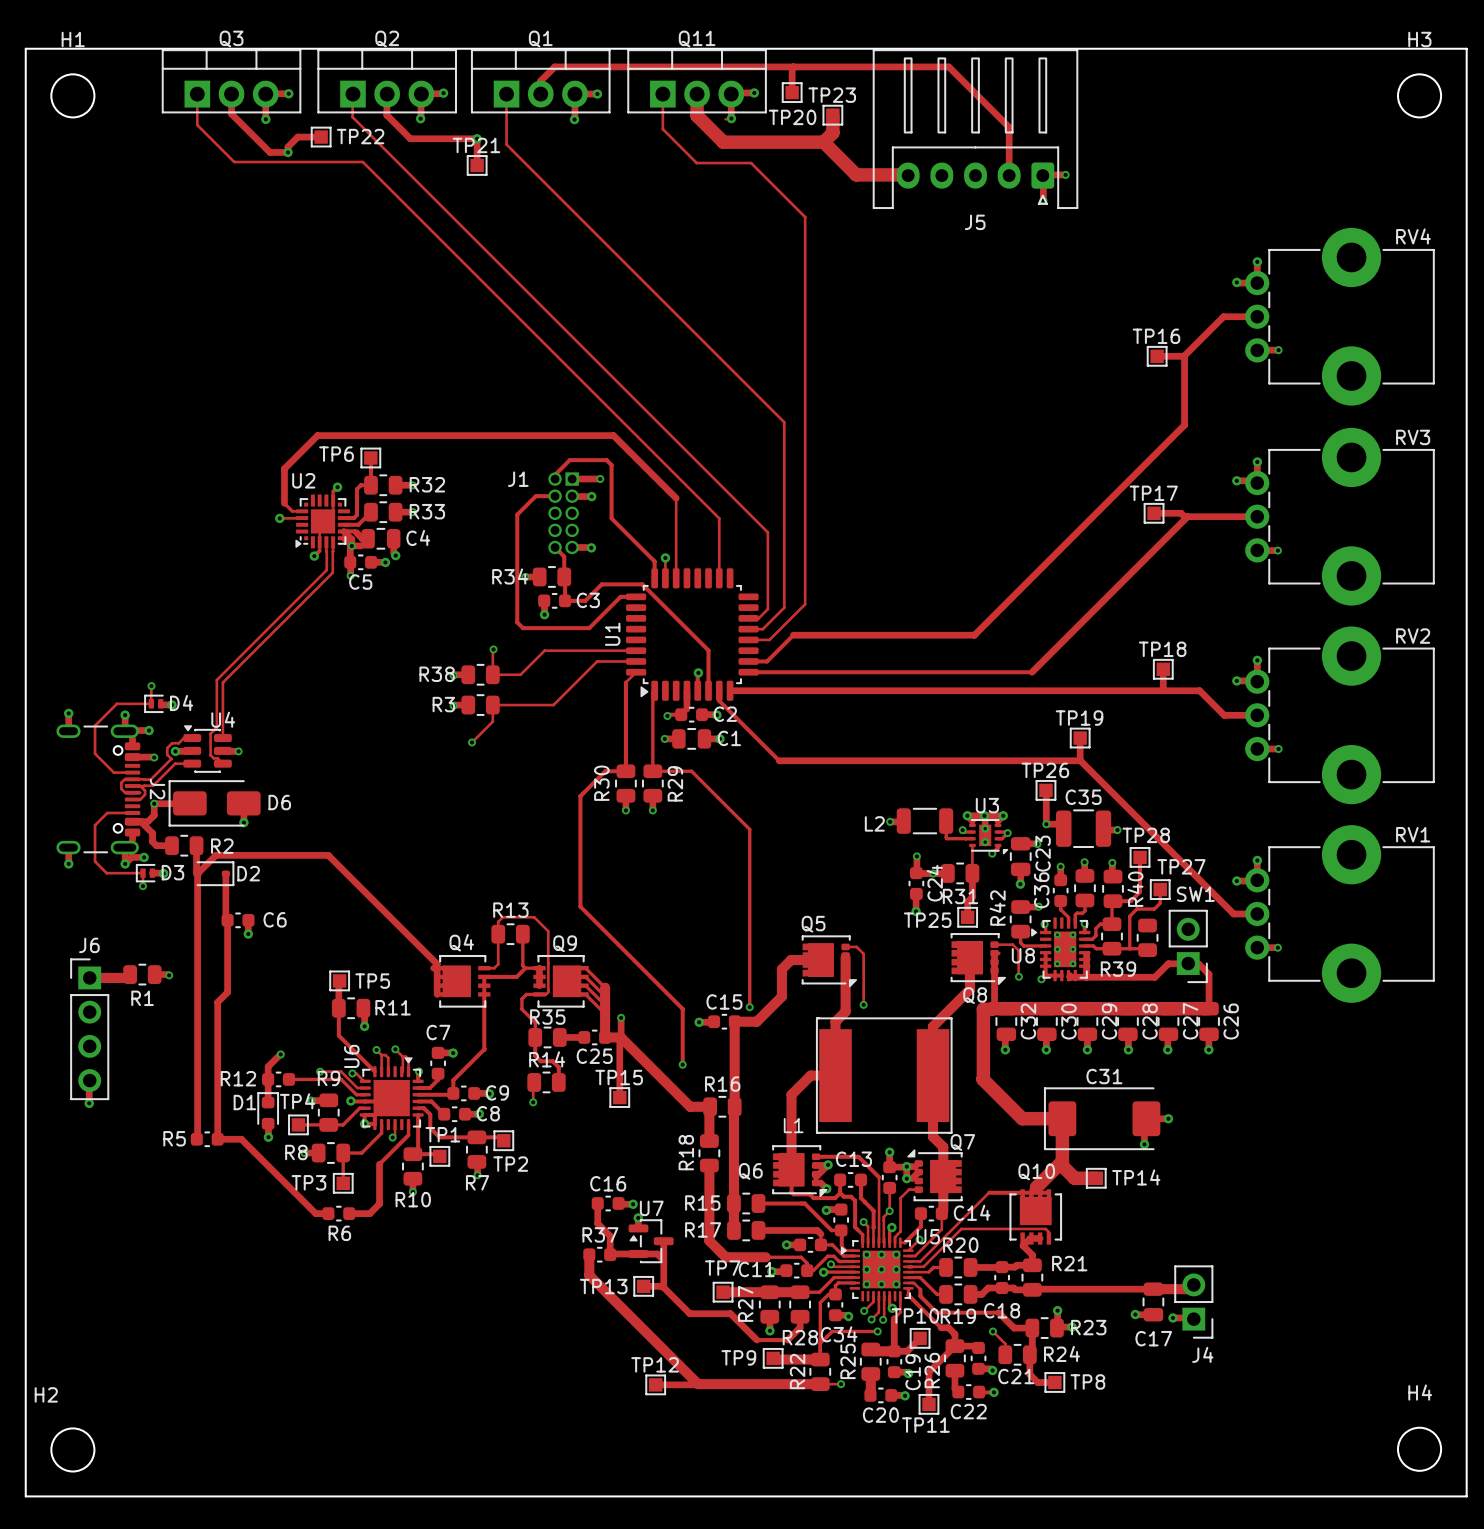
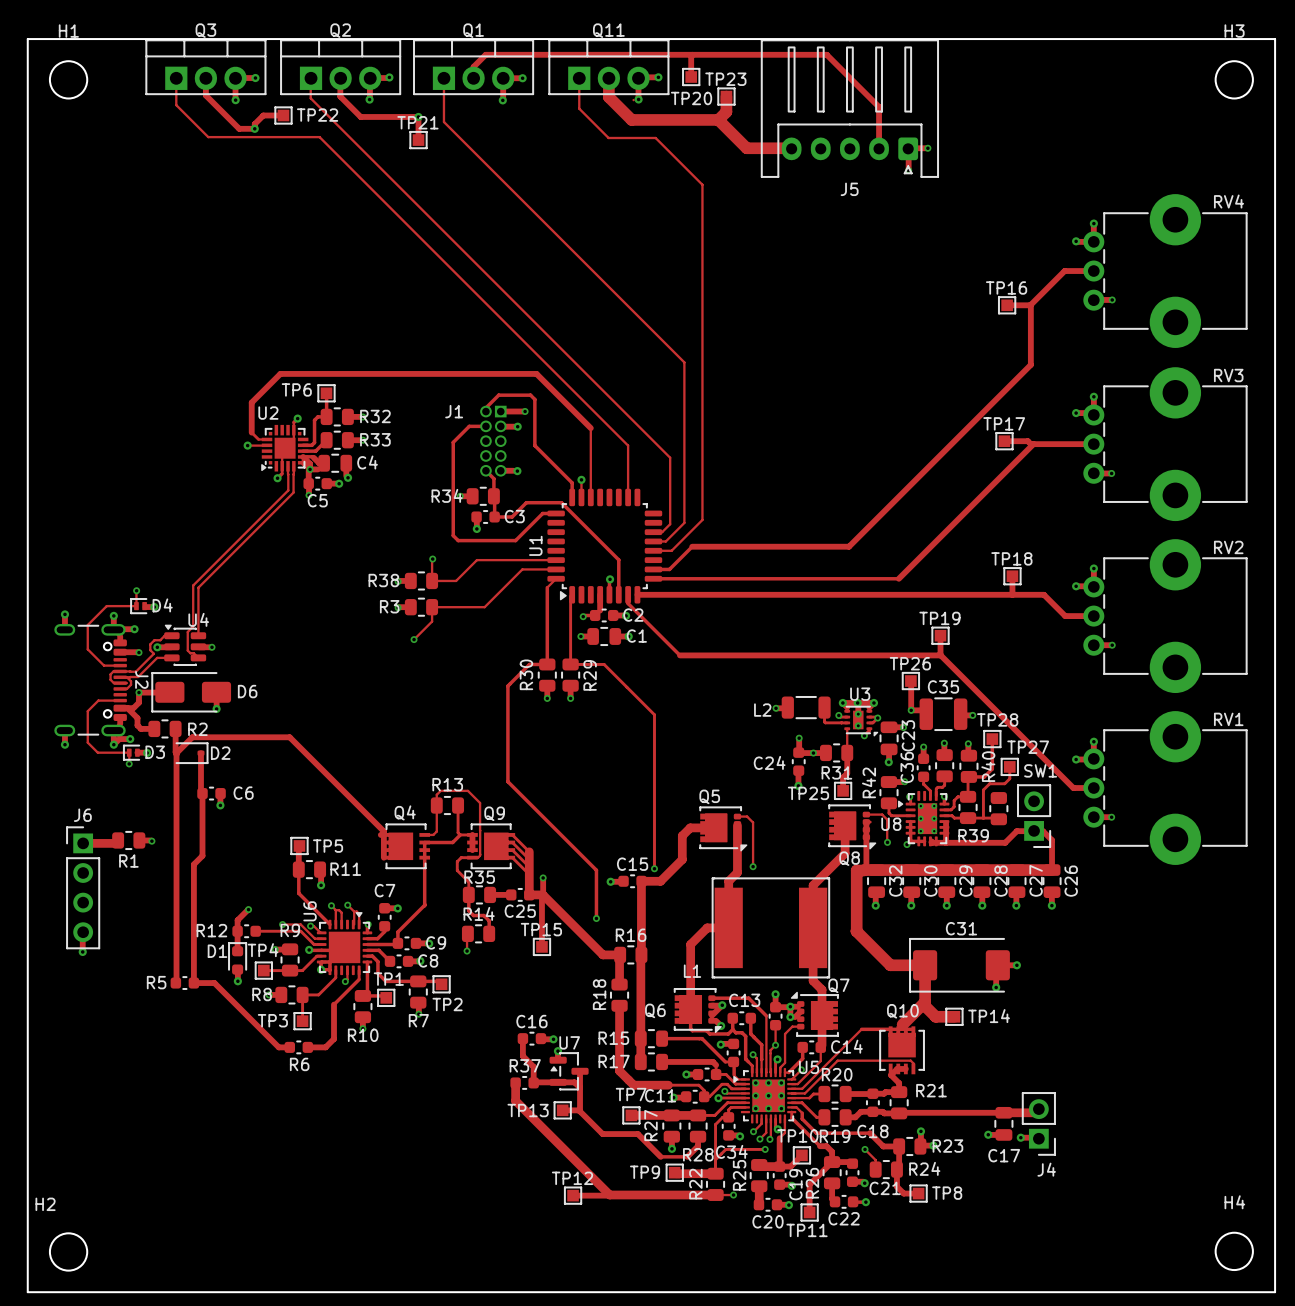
C24 name rotation: 0° (934, 883) -> 90° clockwise (769, 762)
C24 name position: C24 (934, 883) -> C24 (769, 762)

